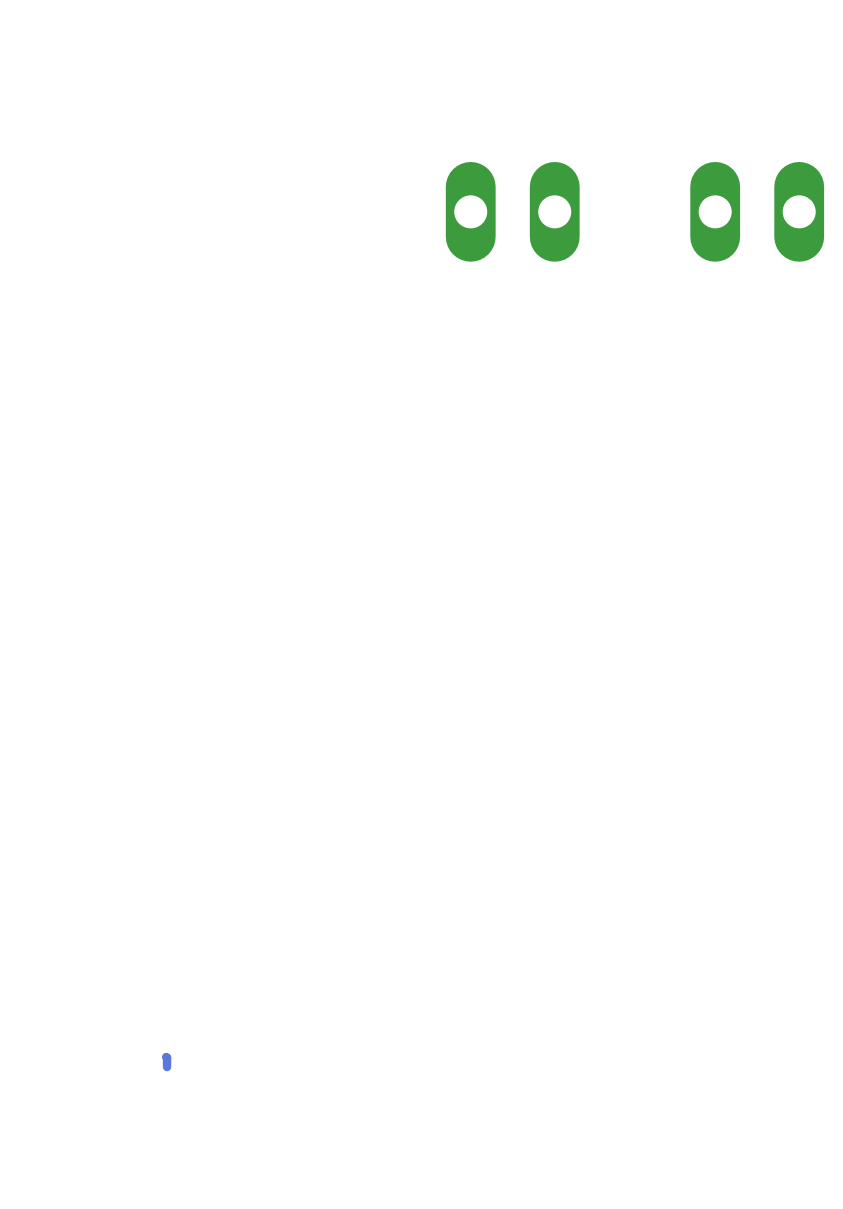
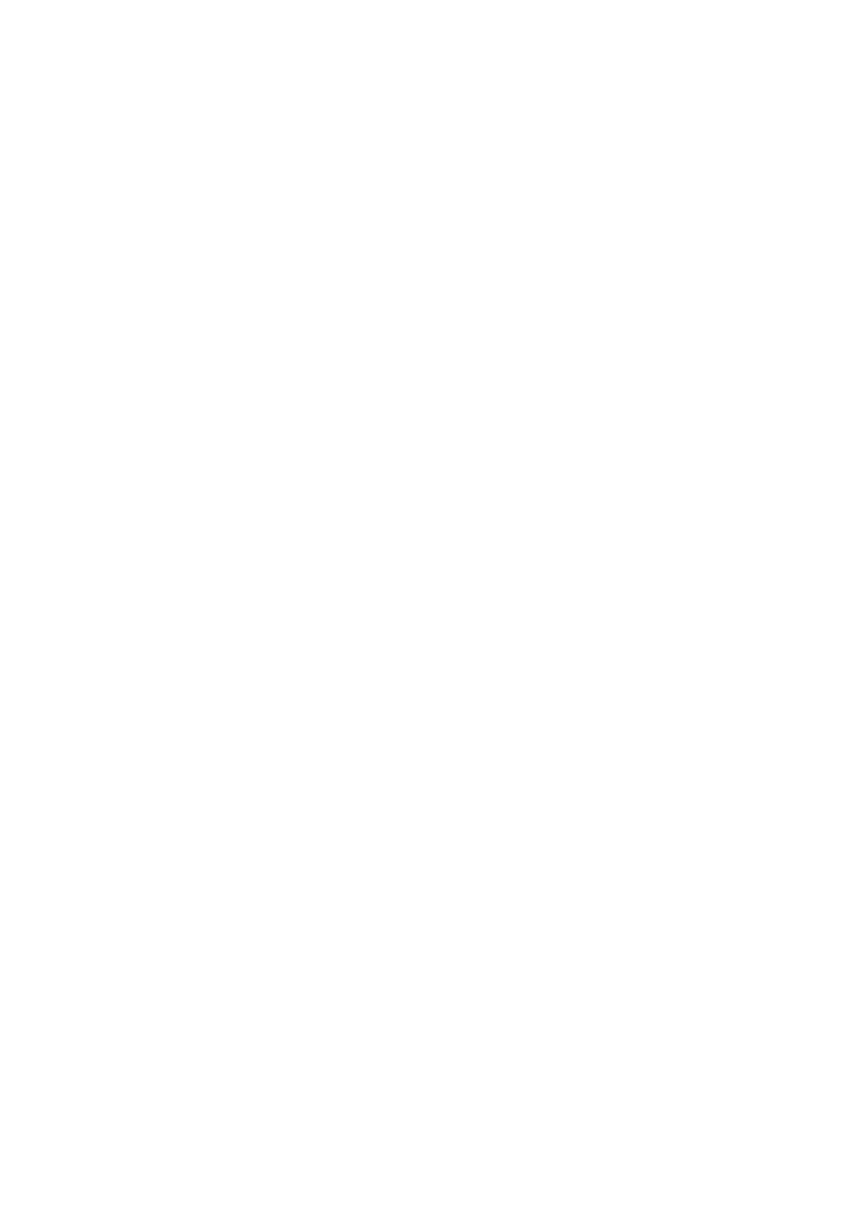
part: (512, 211) -> none
part: (757, 211) -> none
track: (166, 1056) (167, 1067) -> none

